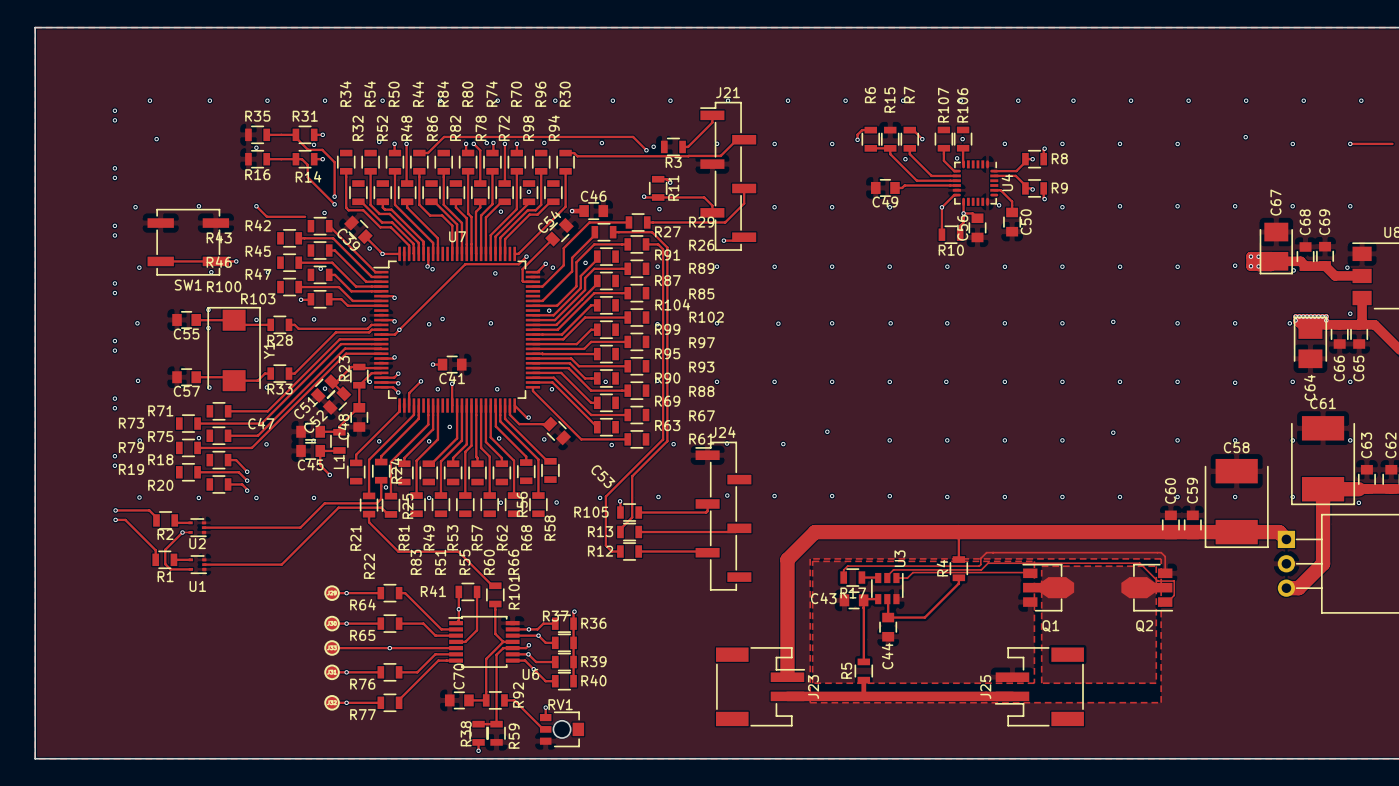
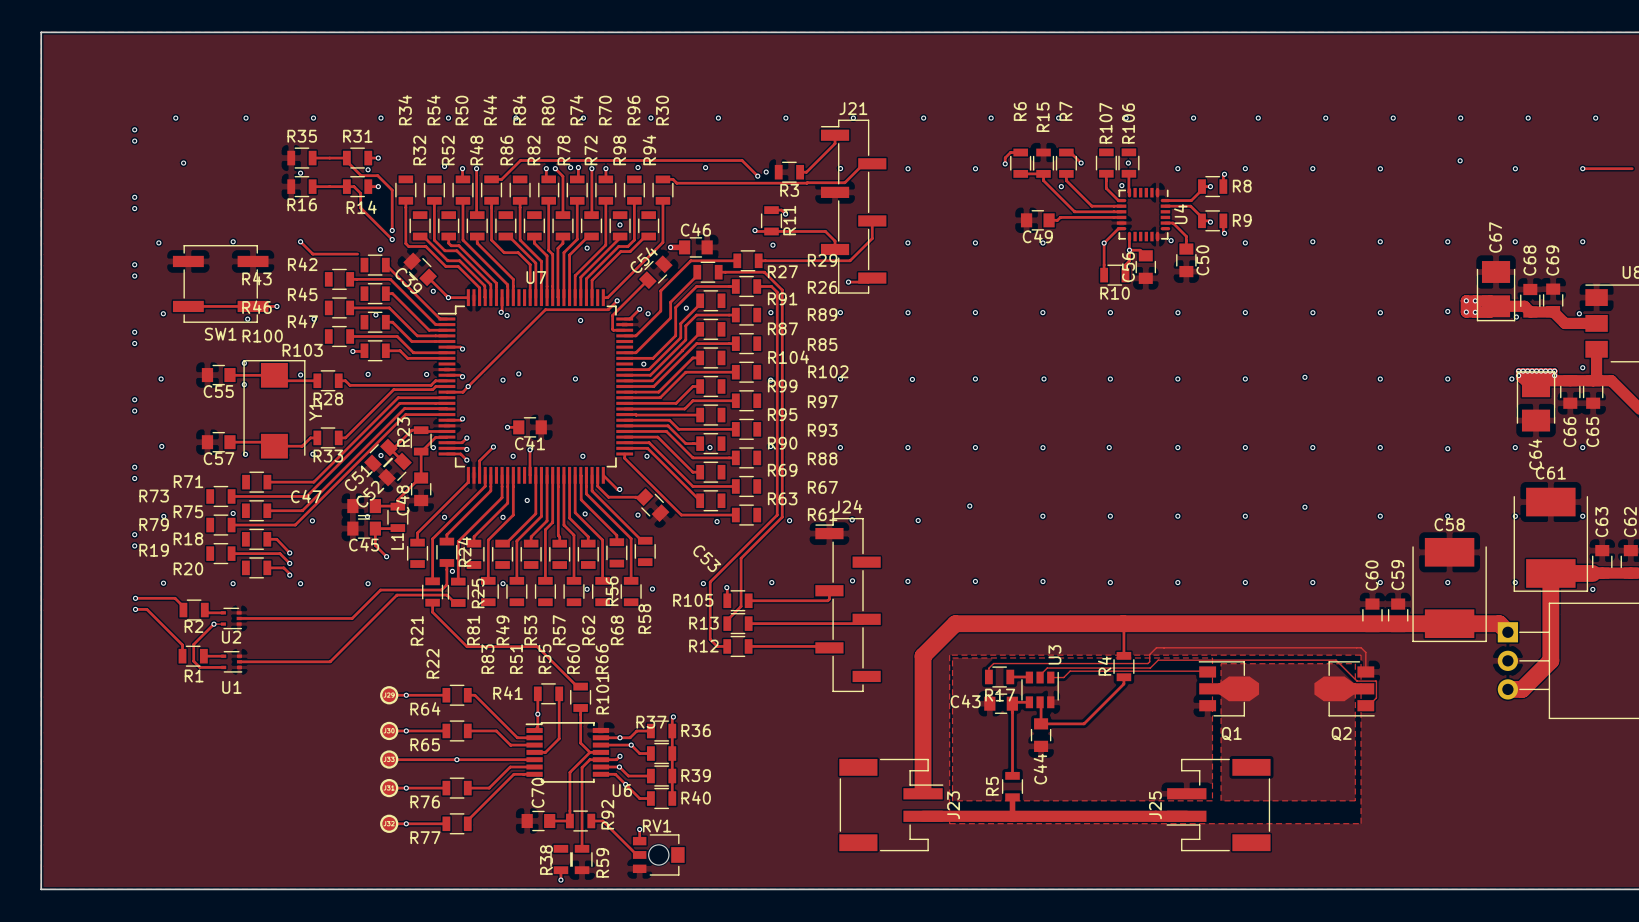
track: (478, 724) (493, 724) -> none

